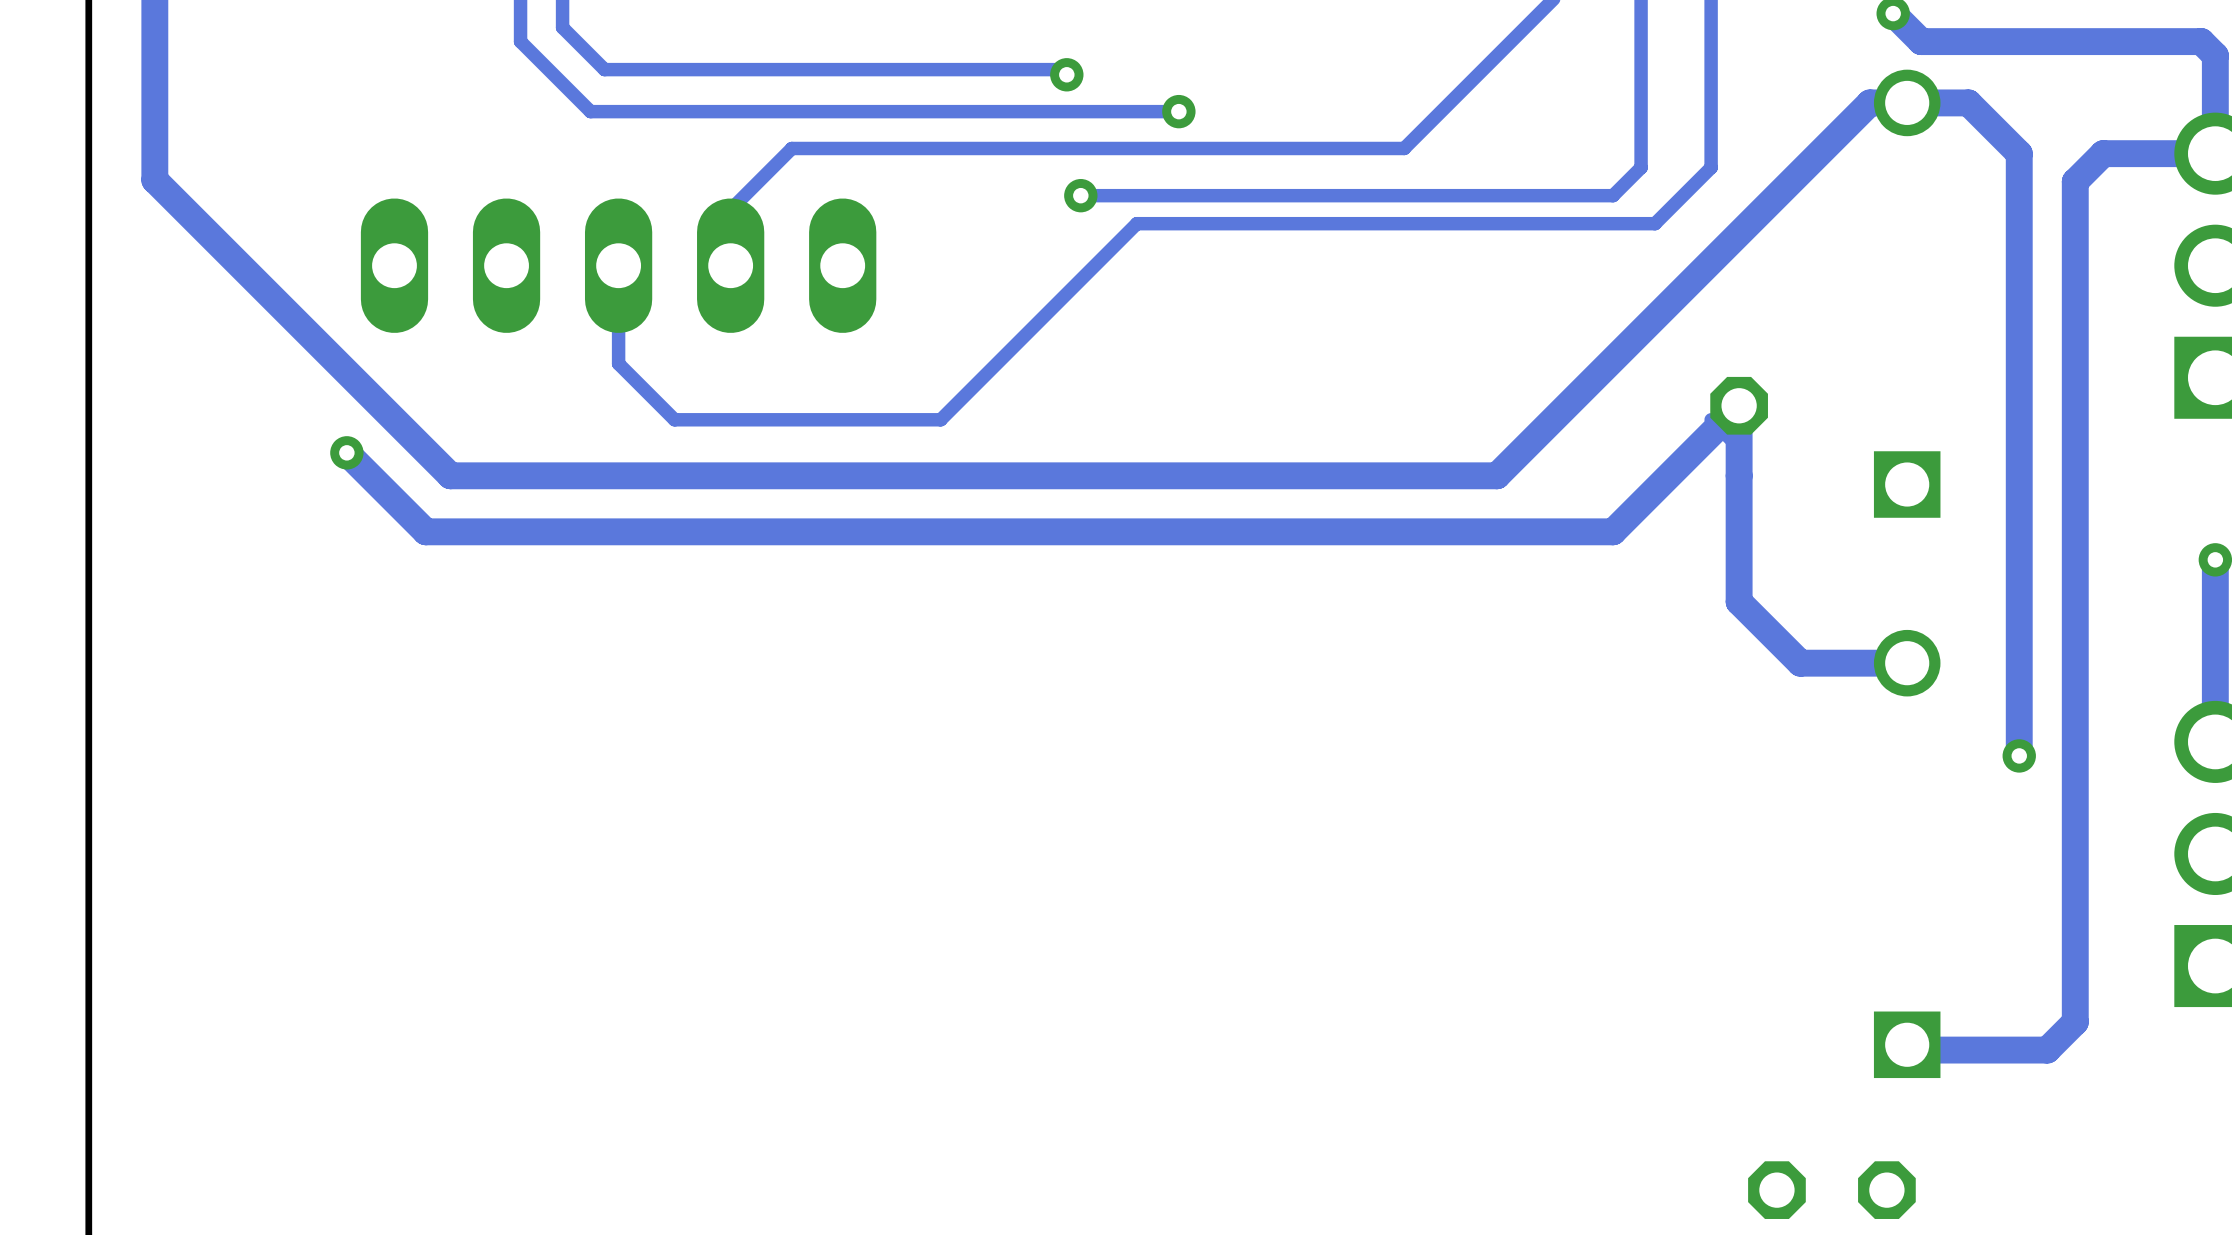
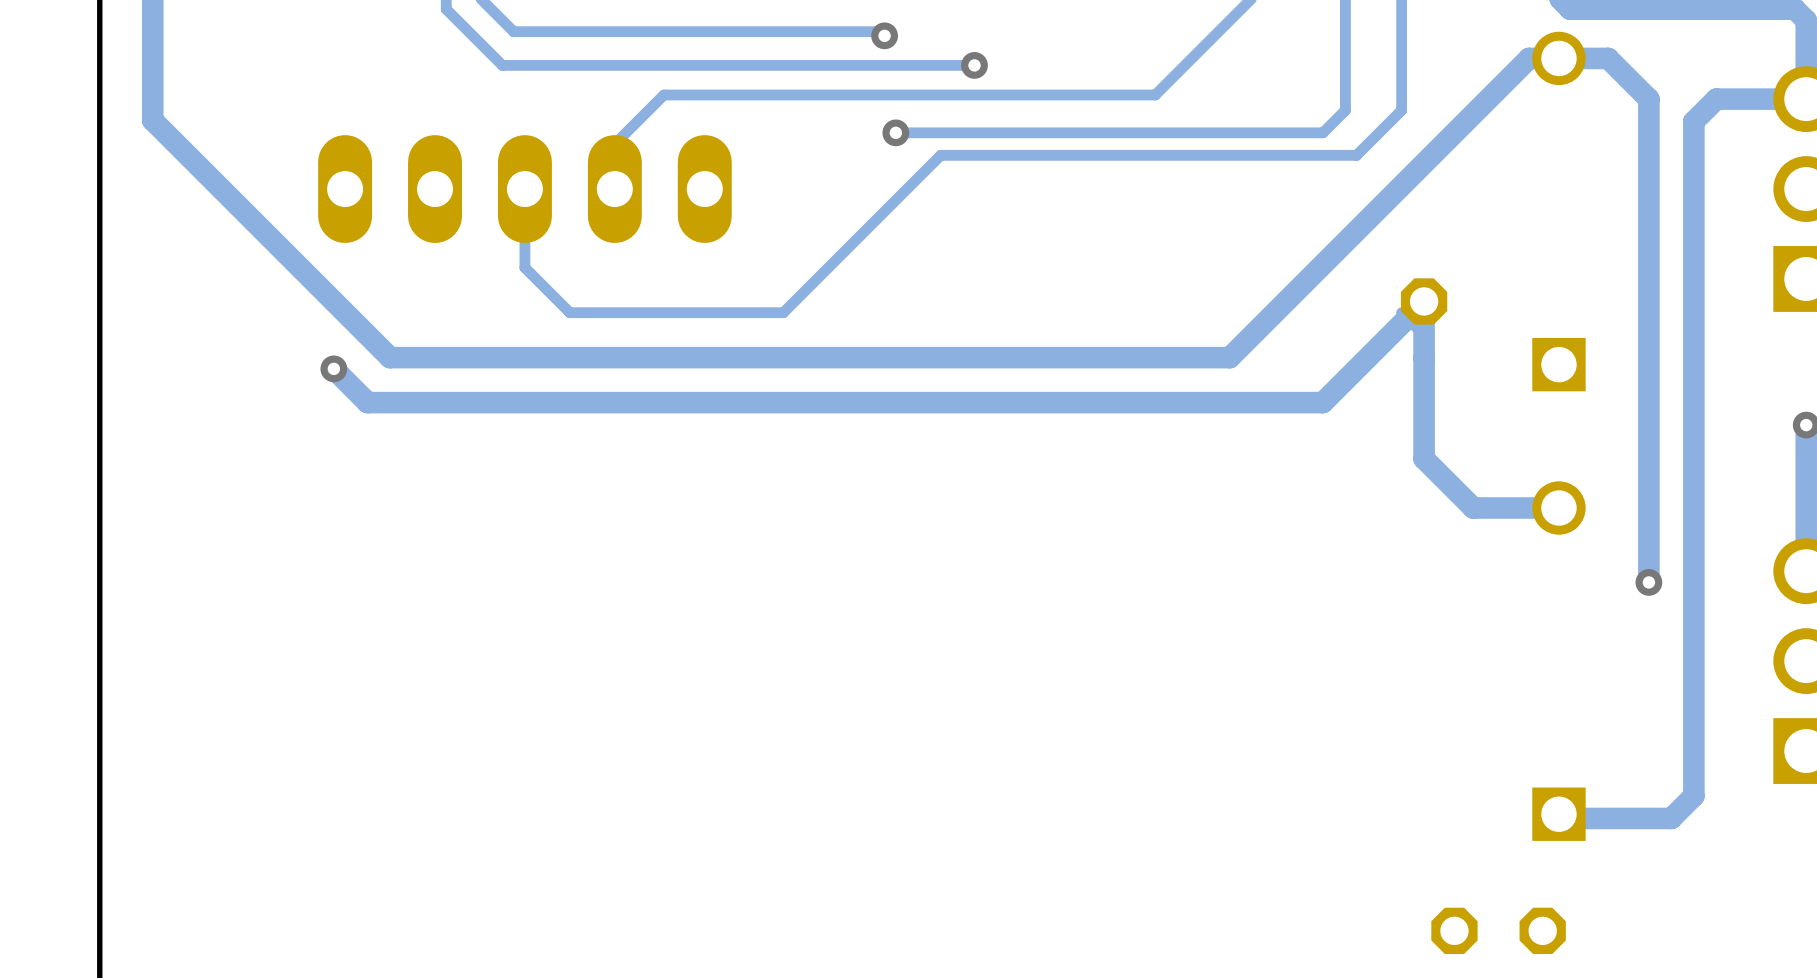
track: (346, 452) (425, 531) -> (333, 368) (367, 402) (370, 402)
via position: (346, 452) -> (333, 368)

